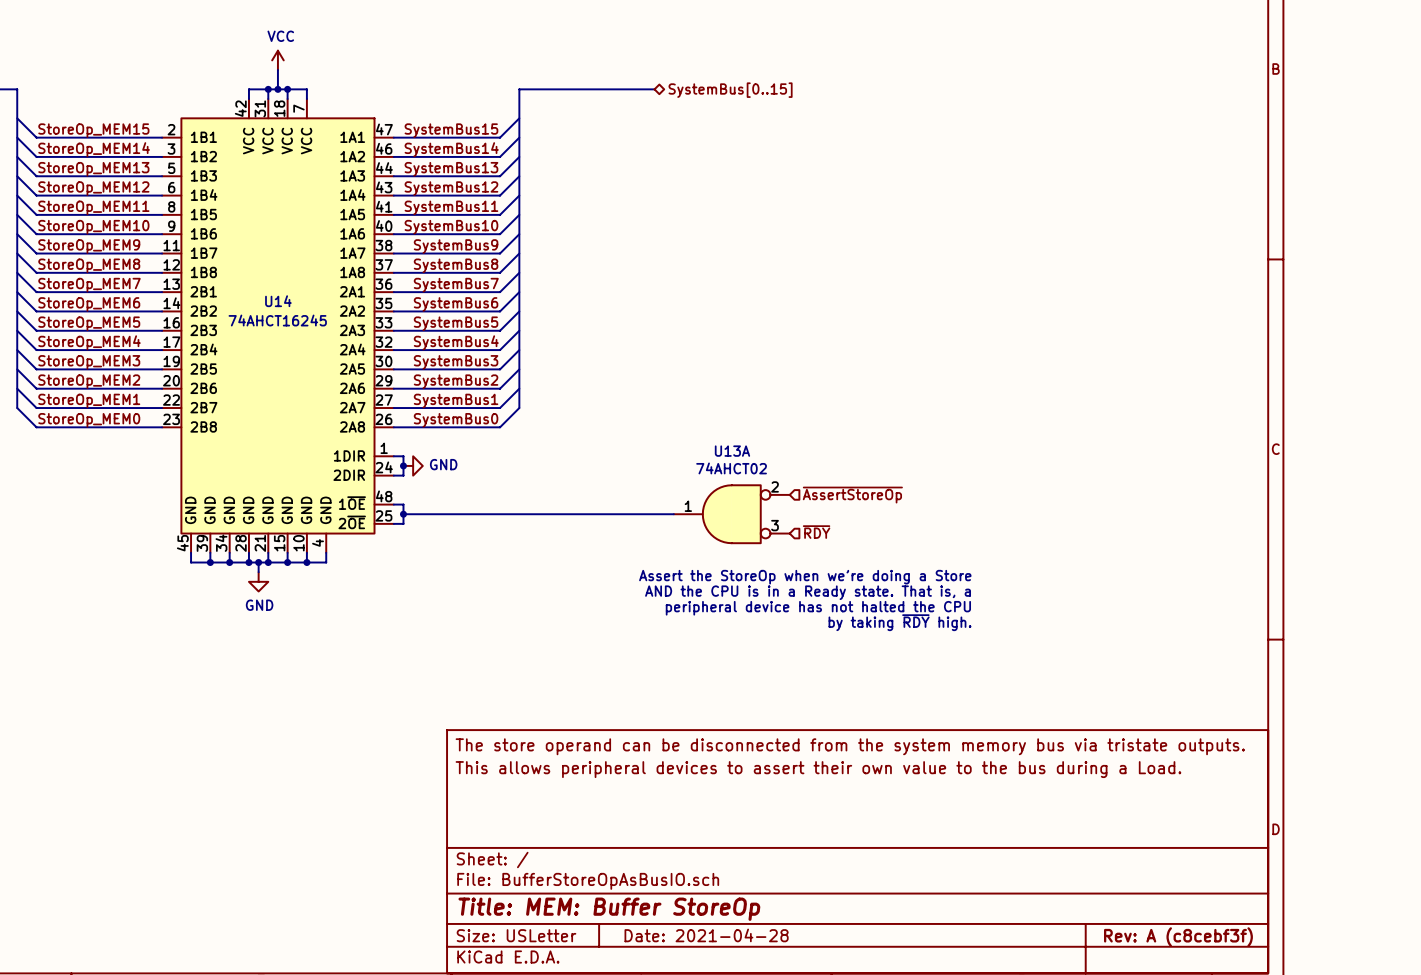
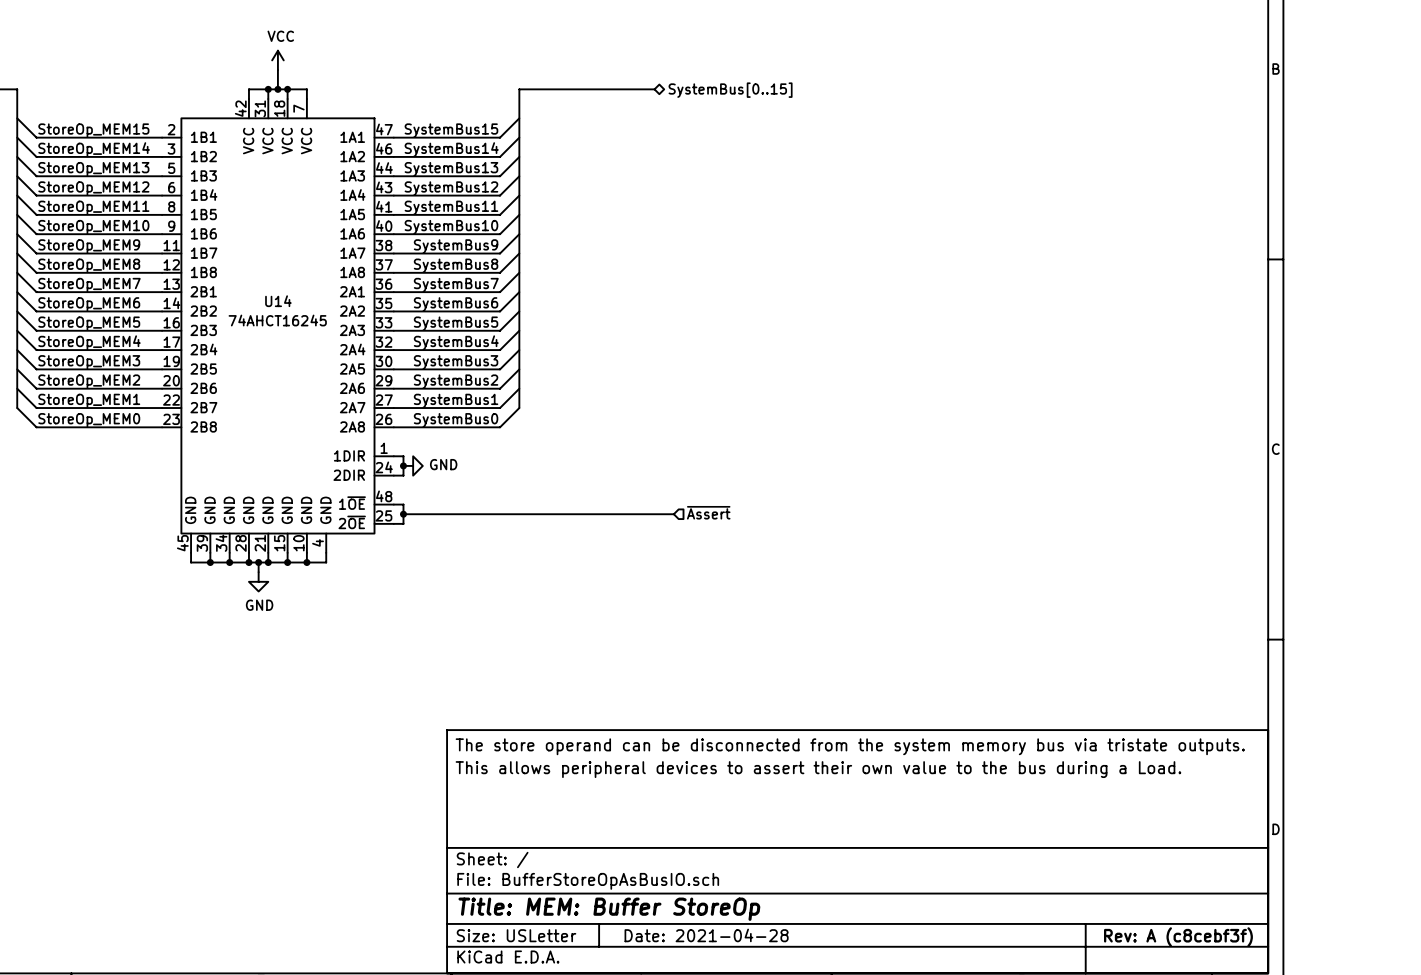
hierarchical label: ~{AssertStoreOp} (852, 495) -> none
hierarchical label: none -> ~{Assert} (708, 512)
U13A: 74AHCT02 (731, 514) -> none
hierarchical label: ~{RDY} (816, 532) -> none
text: Assert the StoreOp when we’re doing a Store (805, 577) -> none
text: AND the CPU is in a Ready state. That is, a (808, 592) -> none
text: peripheral device has not halted the CPU (818, 608) -> none
text: by taking ~{RDY} high. (900, 622) -> none

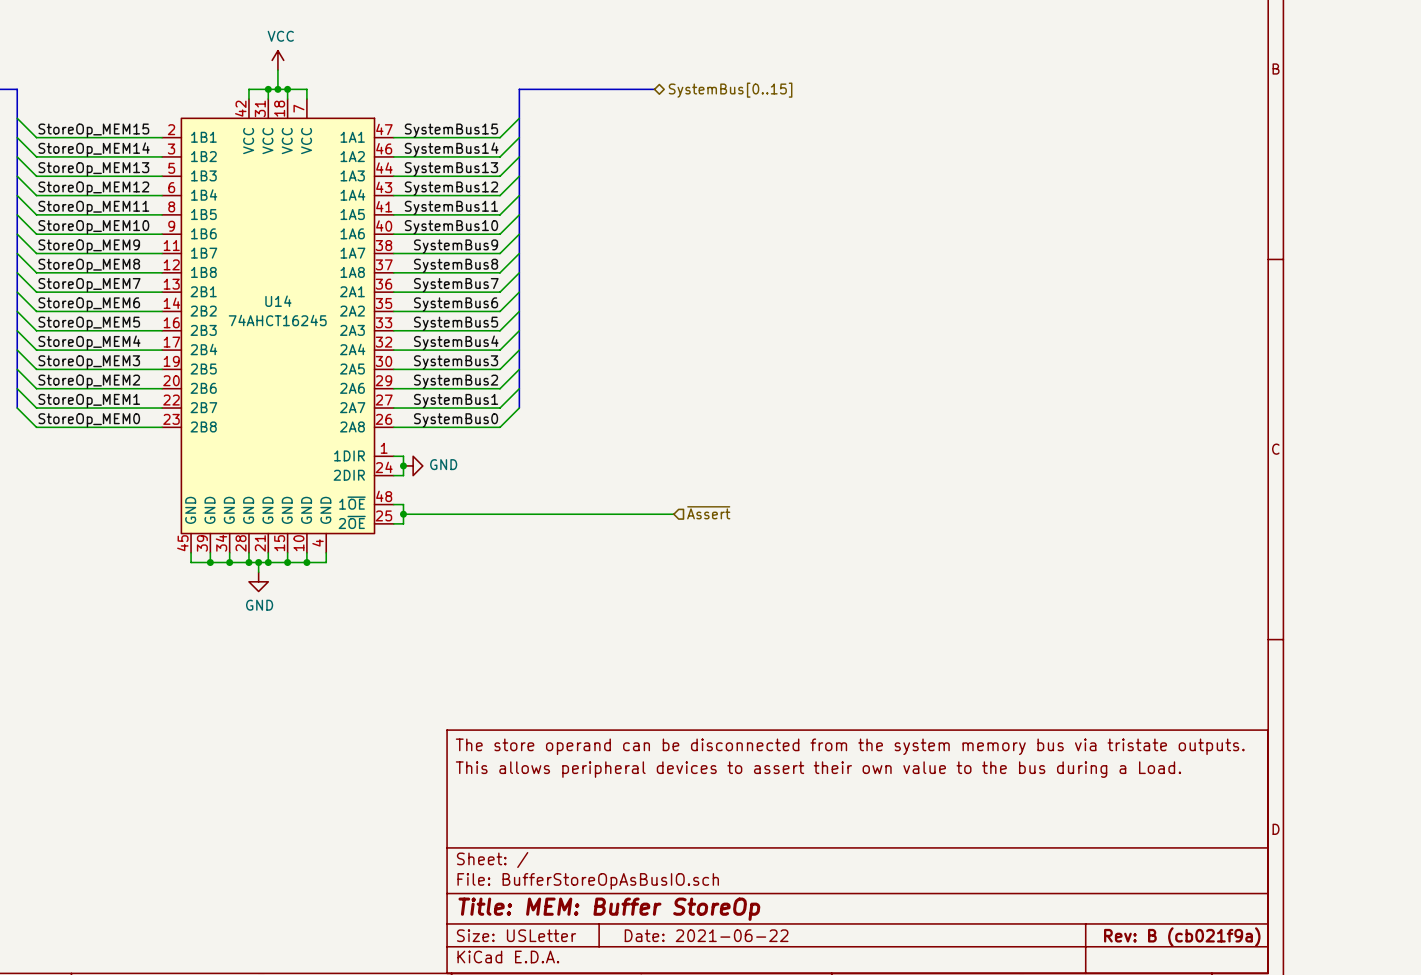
title block: Date: 2021-04-28 (706, 935) -> Date: 2021-06-22 (706, 935)
title block: Rev: A (c8cebf3f) (1178, 937) -> Rev: B (cb021f9a) (1182, 937)

